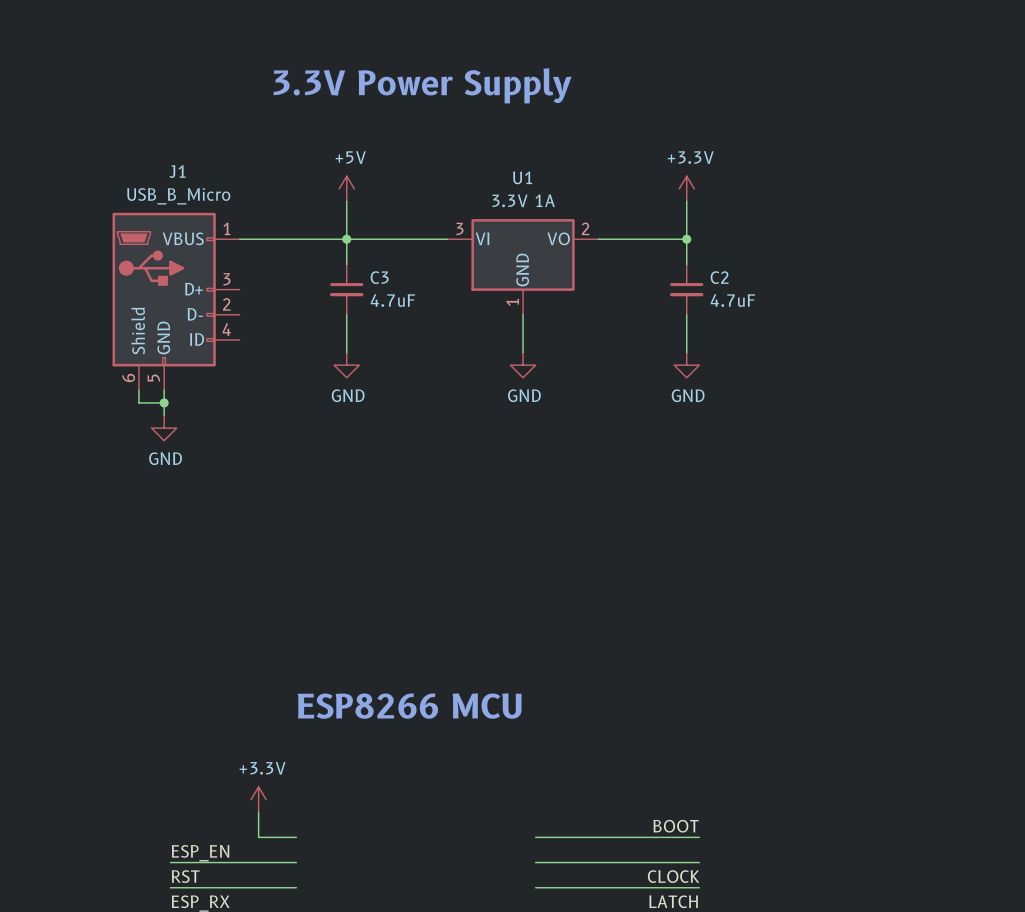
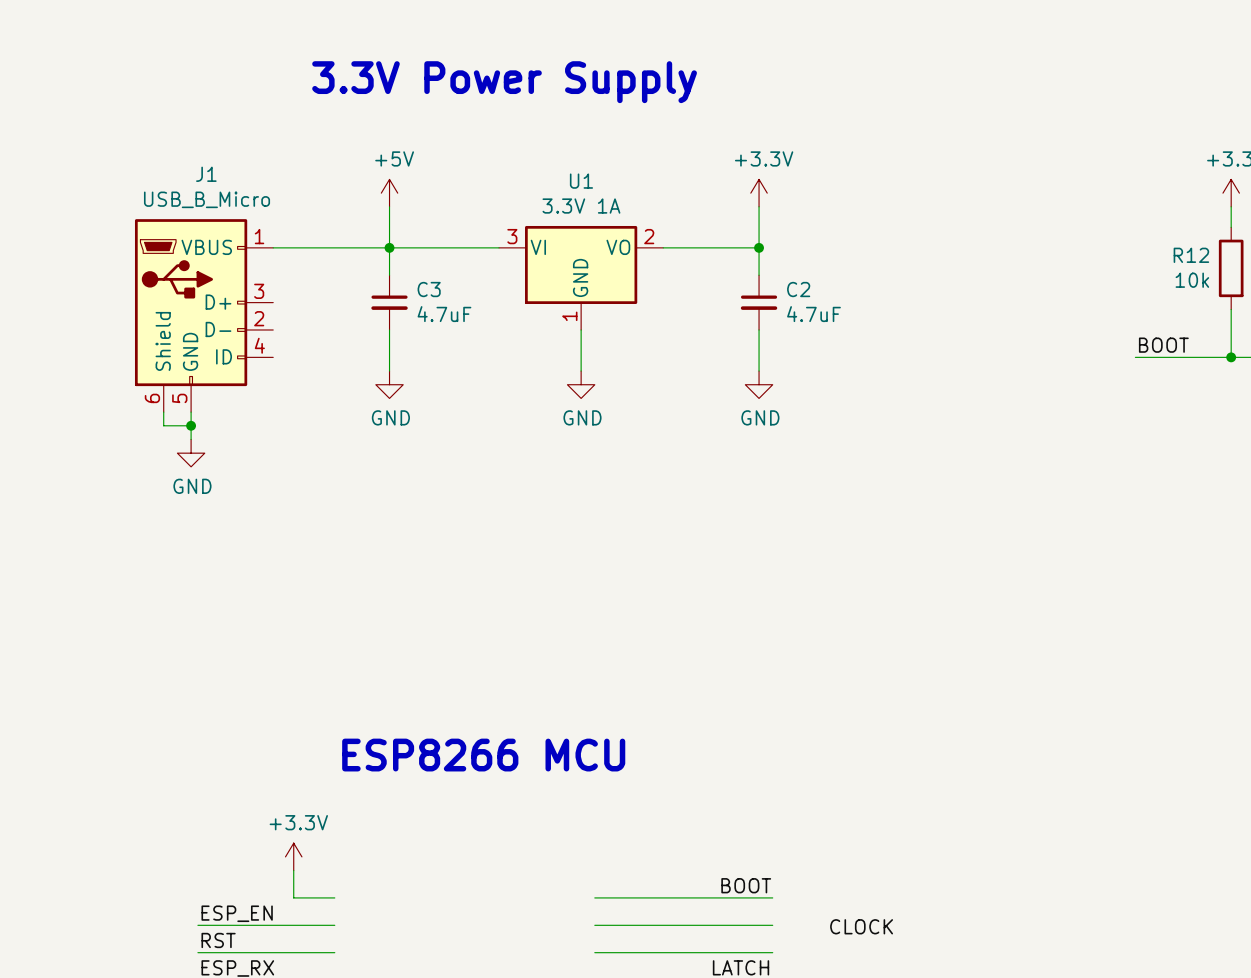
label position: CLOCK (673, 876) -> CLOCK (861, 926)

